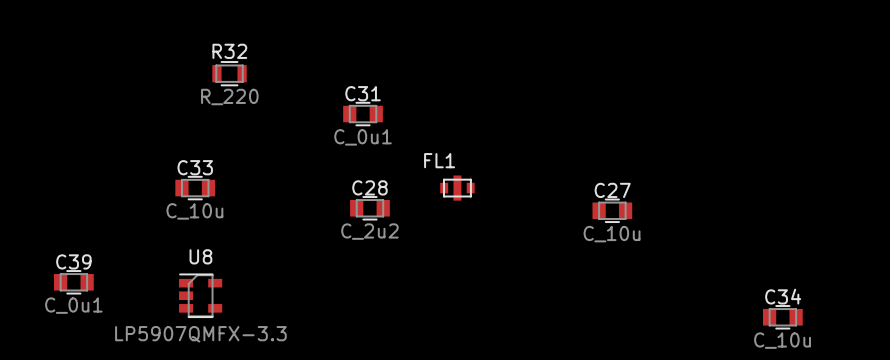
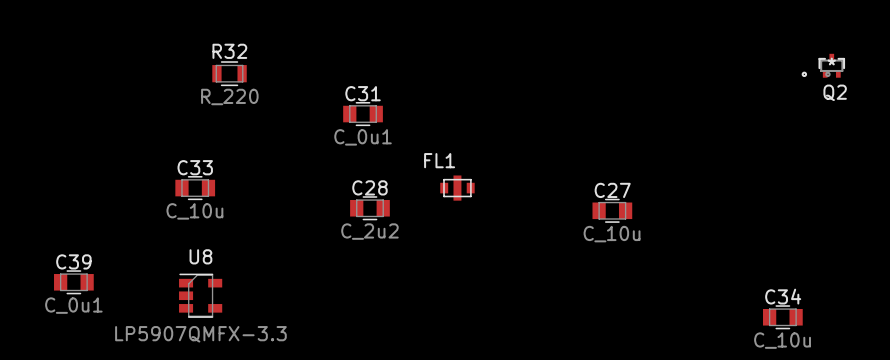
Q2: none -> (823, 65)

